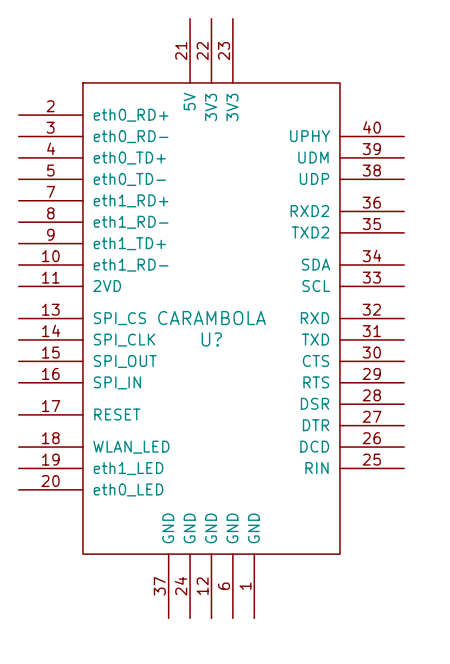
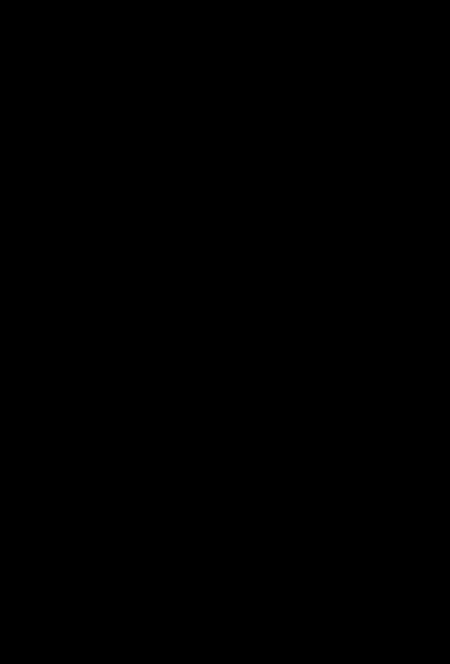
U?: CARAMBOLA (211, 318) -> none

